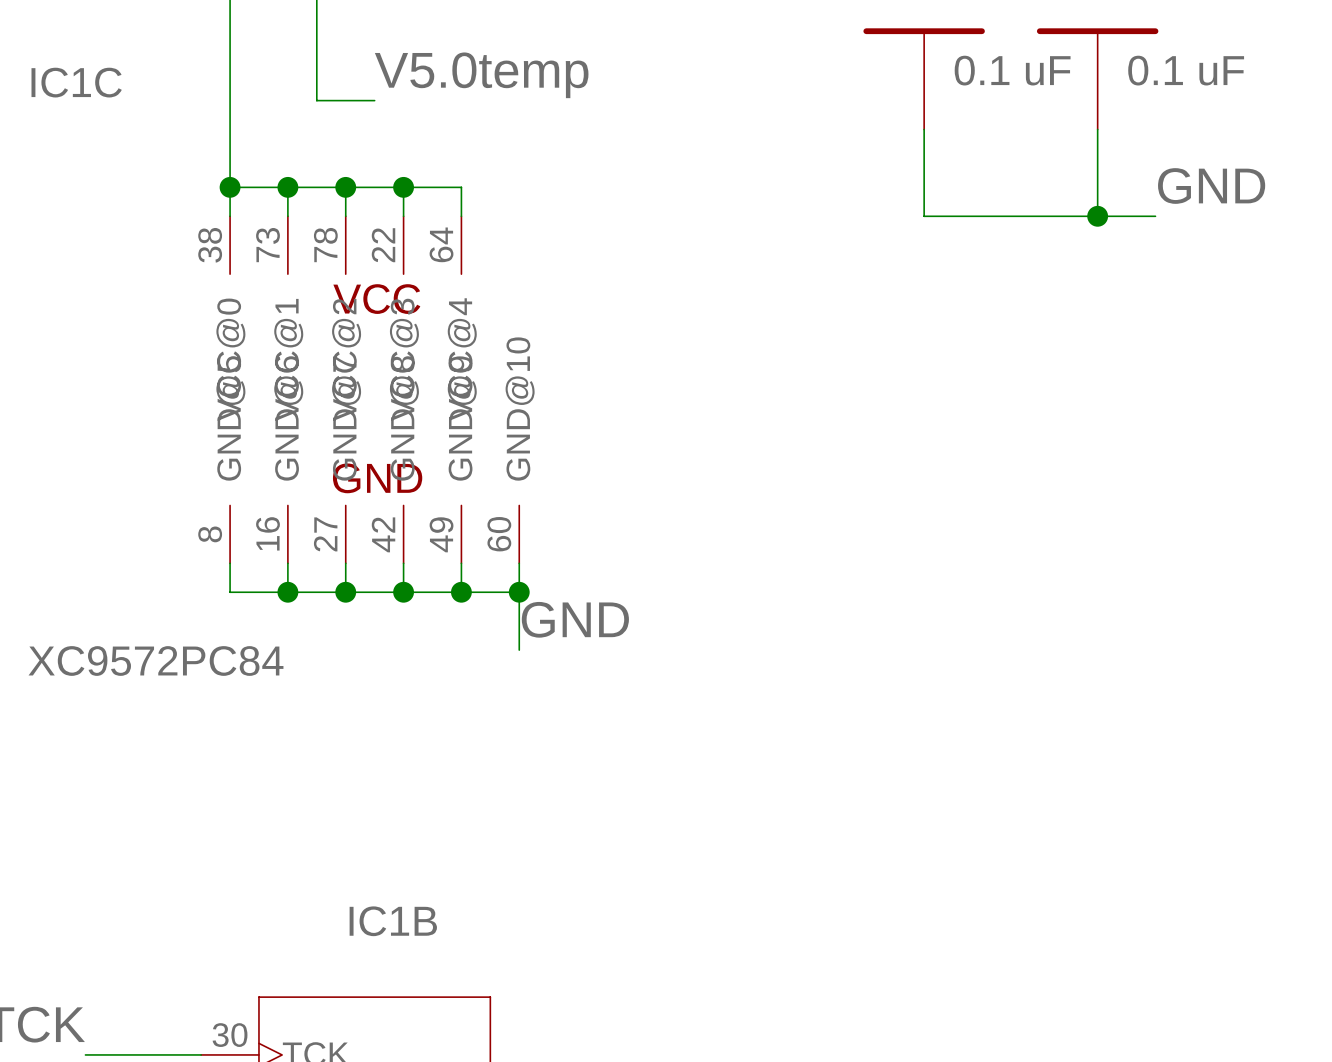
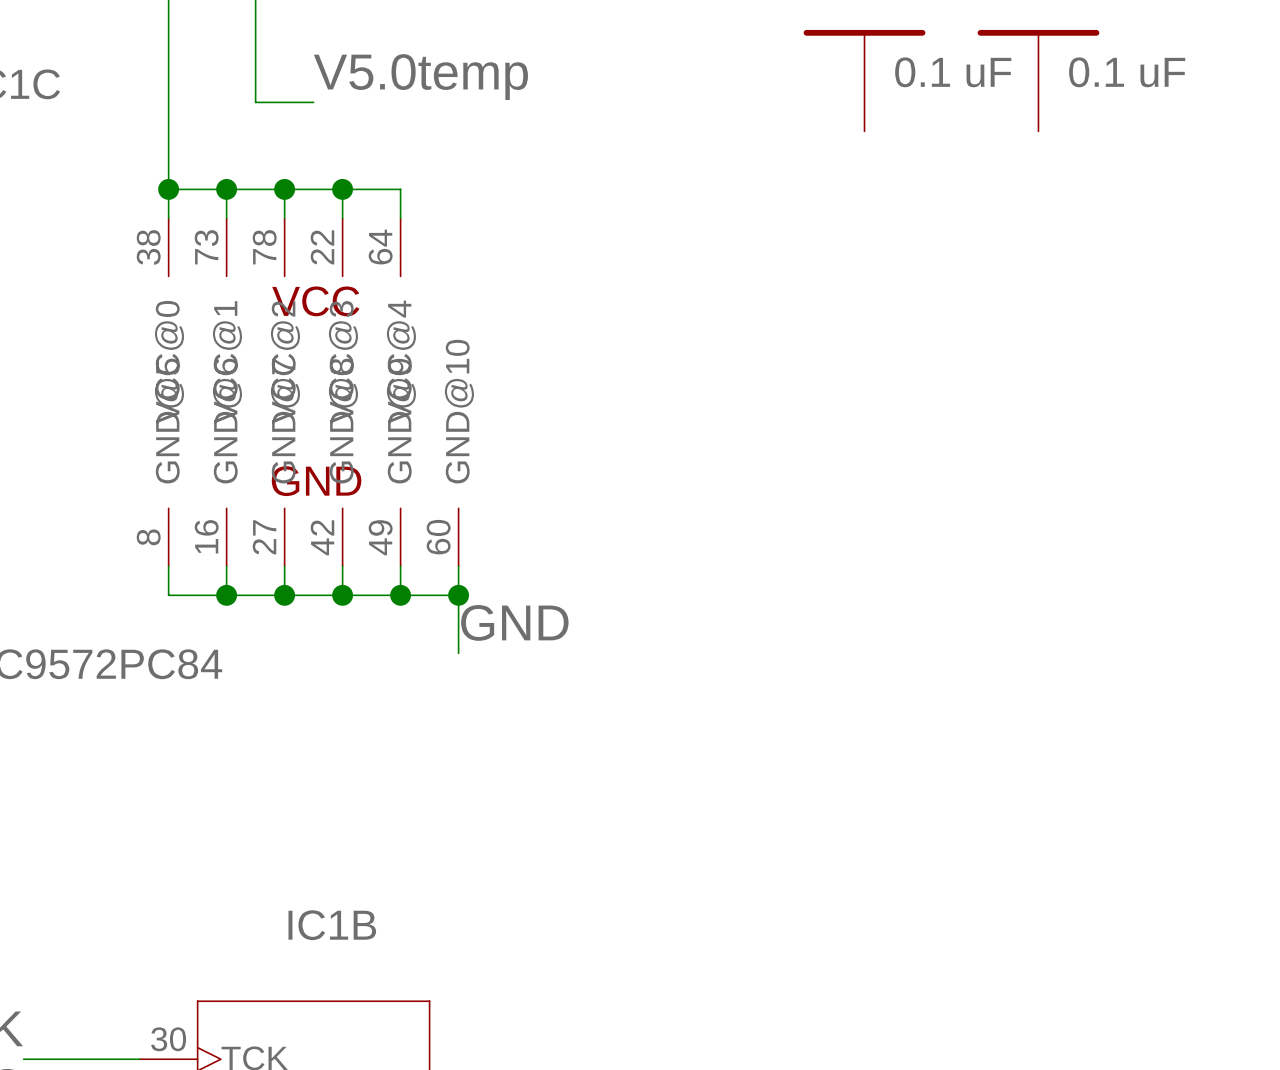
wire: (924, 129) (924, 216) (1155, 216) -> none
wire: (1097, 129) (1097, 216) -> none
label: GND (1211, 186) -> none
junction: (1097, 216) -> none

